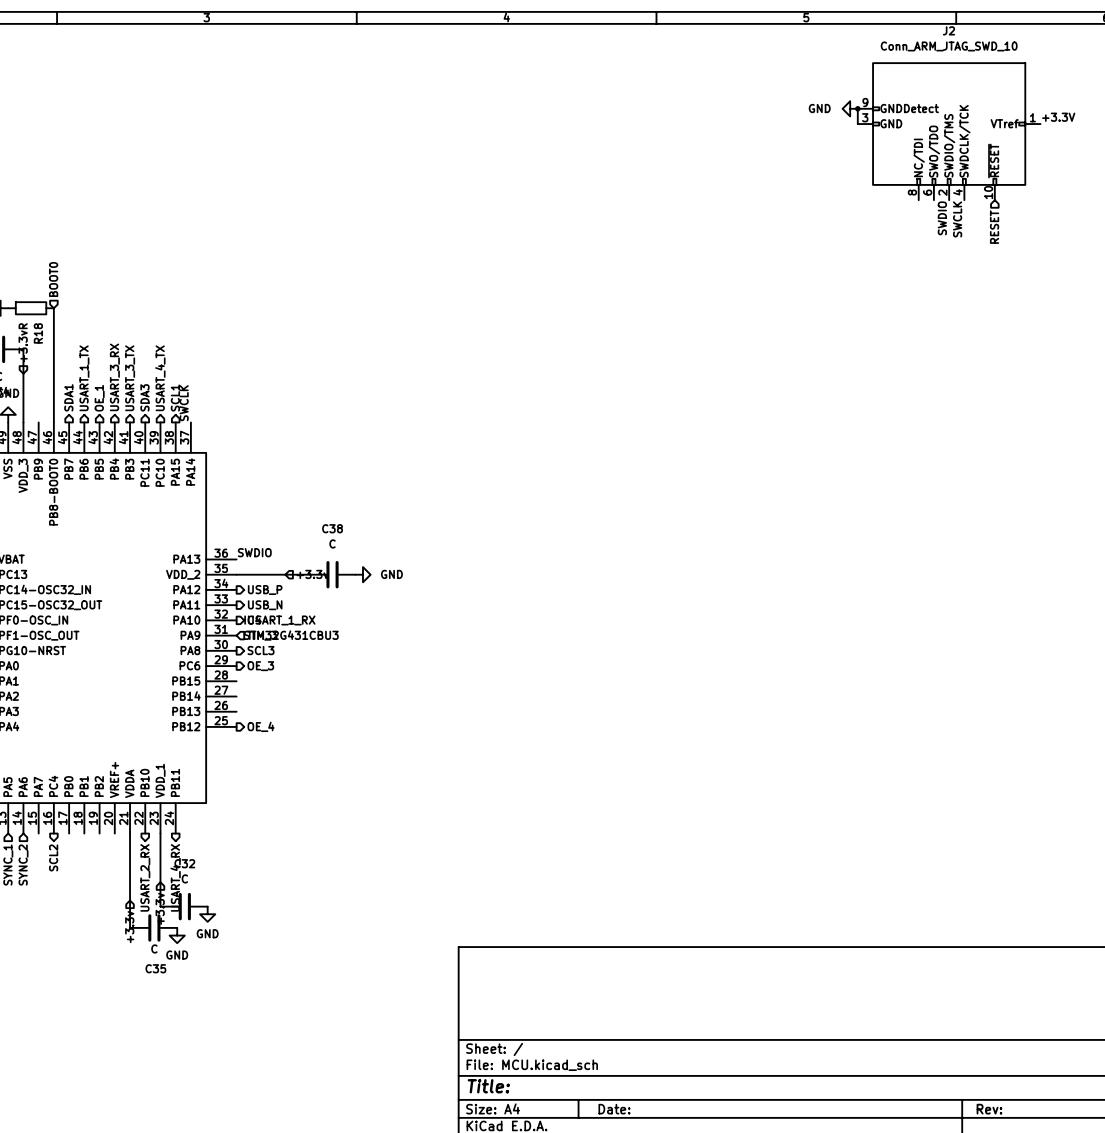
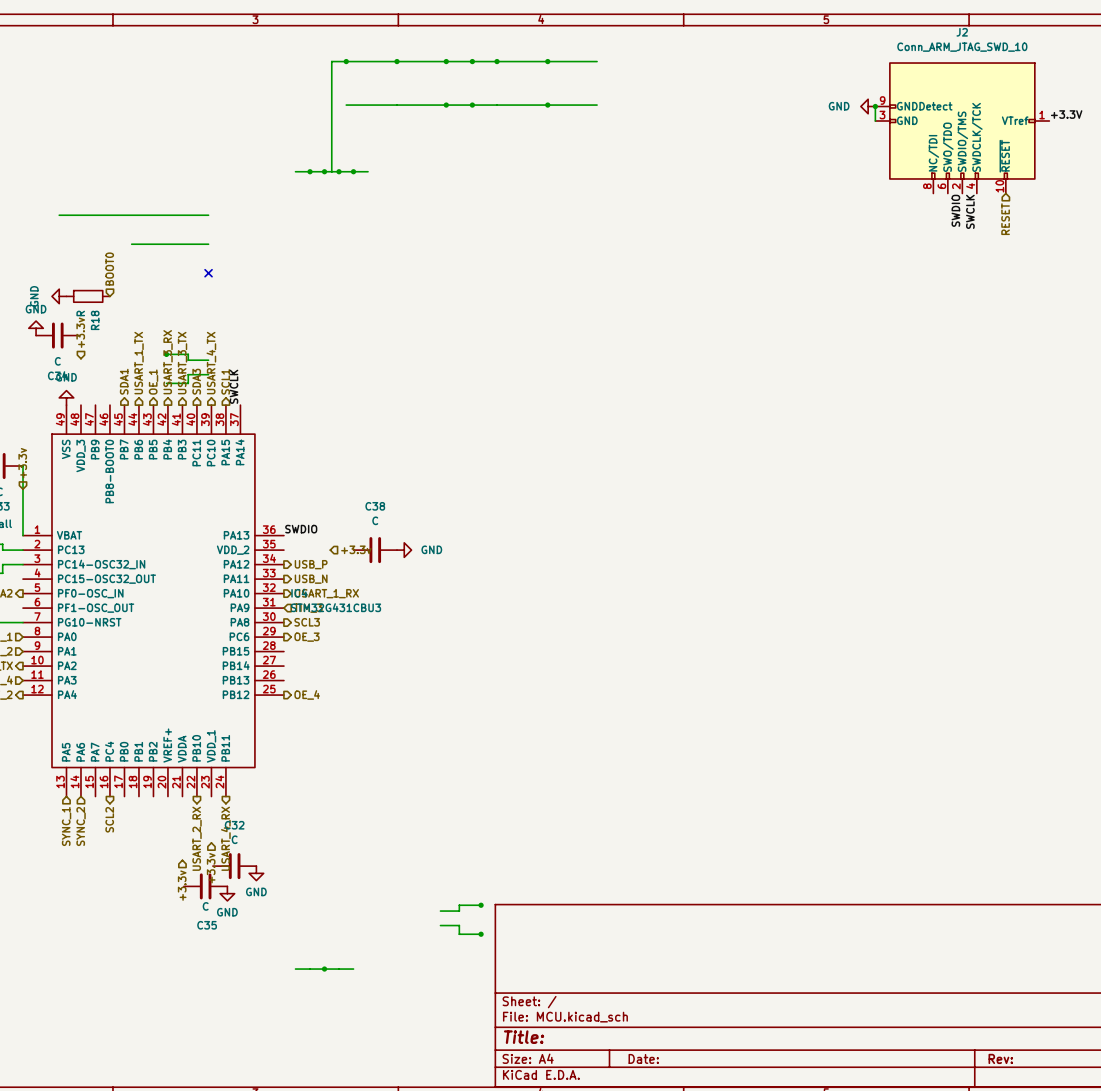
junction: none -> (346, 61)
junction: none -> (397, 61)
junction: none -> (446, 61)
junction: none -> (472, 61)
junction: none -> (497, 61)
junction: none -> (547, 61)
wire: none -> (597, 61) (331, 61) (331, 171)
wire: none -> (346, 105) (597, 105)
junction: none -> (446, 105)
junction: none -> (472, 105)
junction: none -> (547, 105)
wire: none -> (295, 171) (368, 171)
junction: none -> (310, 171)
junction: none -> (324, 171)
junction: none -> (339, 171)
junction: none -> (353, 171)
wire: none -> (59, 215) (208, 215)
wire: none -> (131, 244) (208, 244)
no-connect mark: none -> (208, 273)
wire: (53, 308) (53, 422) -> none
wire: (21, 349) (23, 349) (23, 422) -> none
wire: none -> (166, 354) (188, 354) (188, 360) (208, 360)
junction: none -> (166, 354)
wire: none -> (208, 374) (188, 374) (188, 383) (166, 383)
wire: (236, 574) (309, 574) -> none
wire: (130, 833) (130, 927) (131, 927) -> none
wire: (160, 833) (160, 906) (162, 906) -> none
wire: none -> (481, 905) (459, 905) (459, 911) (440, 911)
junction: none -> (481, 905)
wire: none -> (440, 925) (459, 925) (459, 934) (481, 934)
junction: none -> (481, 934)
wire: none -> (295, 969) (353, 969)
junction: none -> (324, 969)

